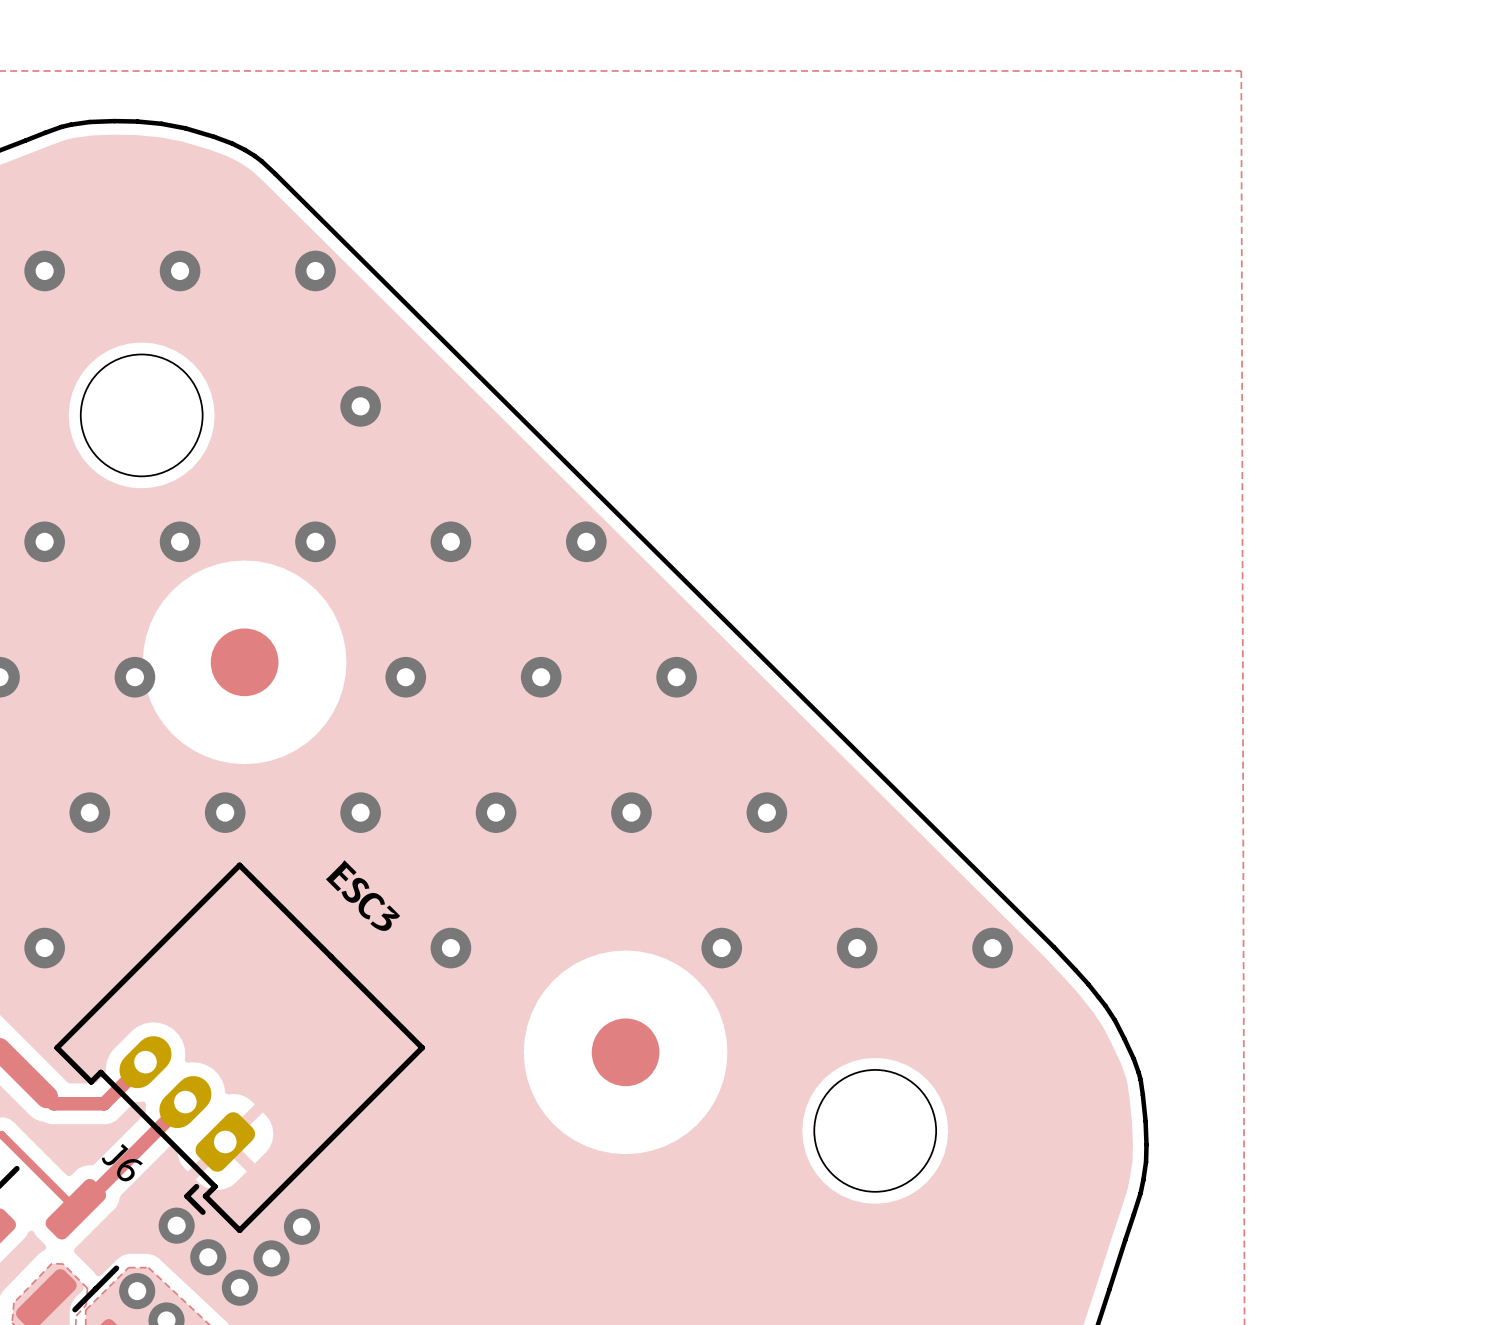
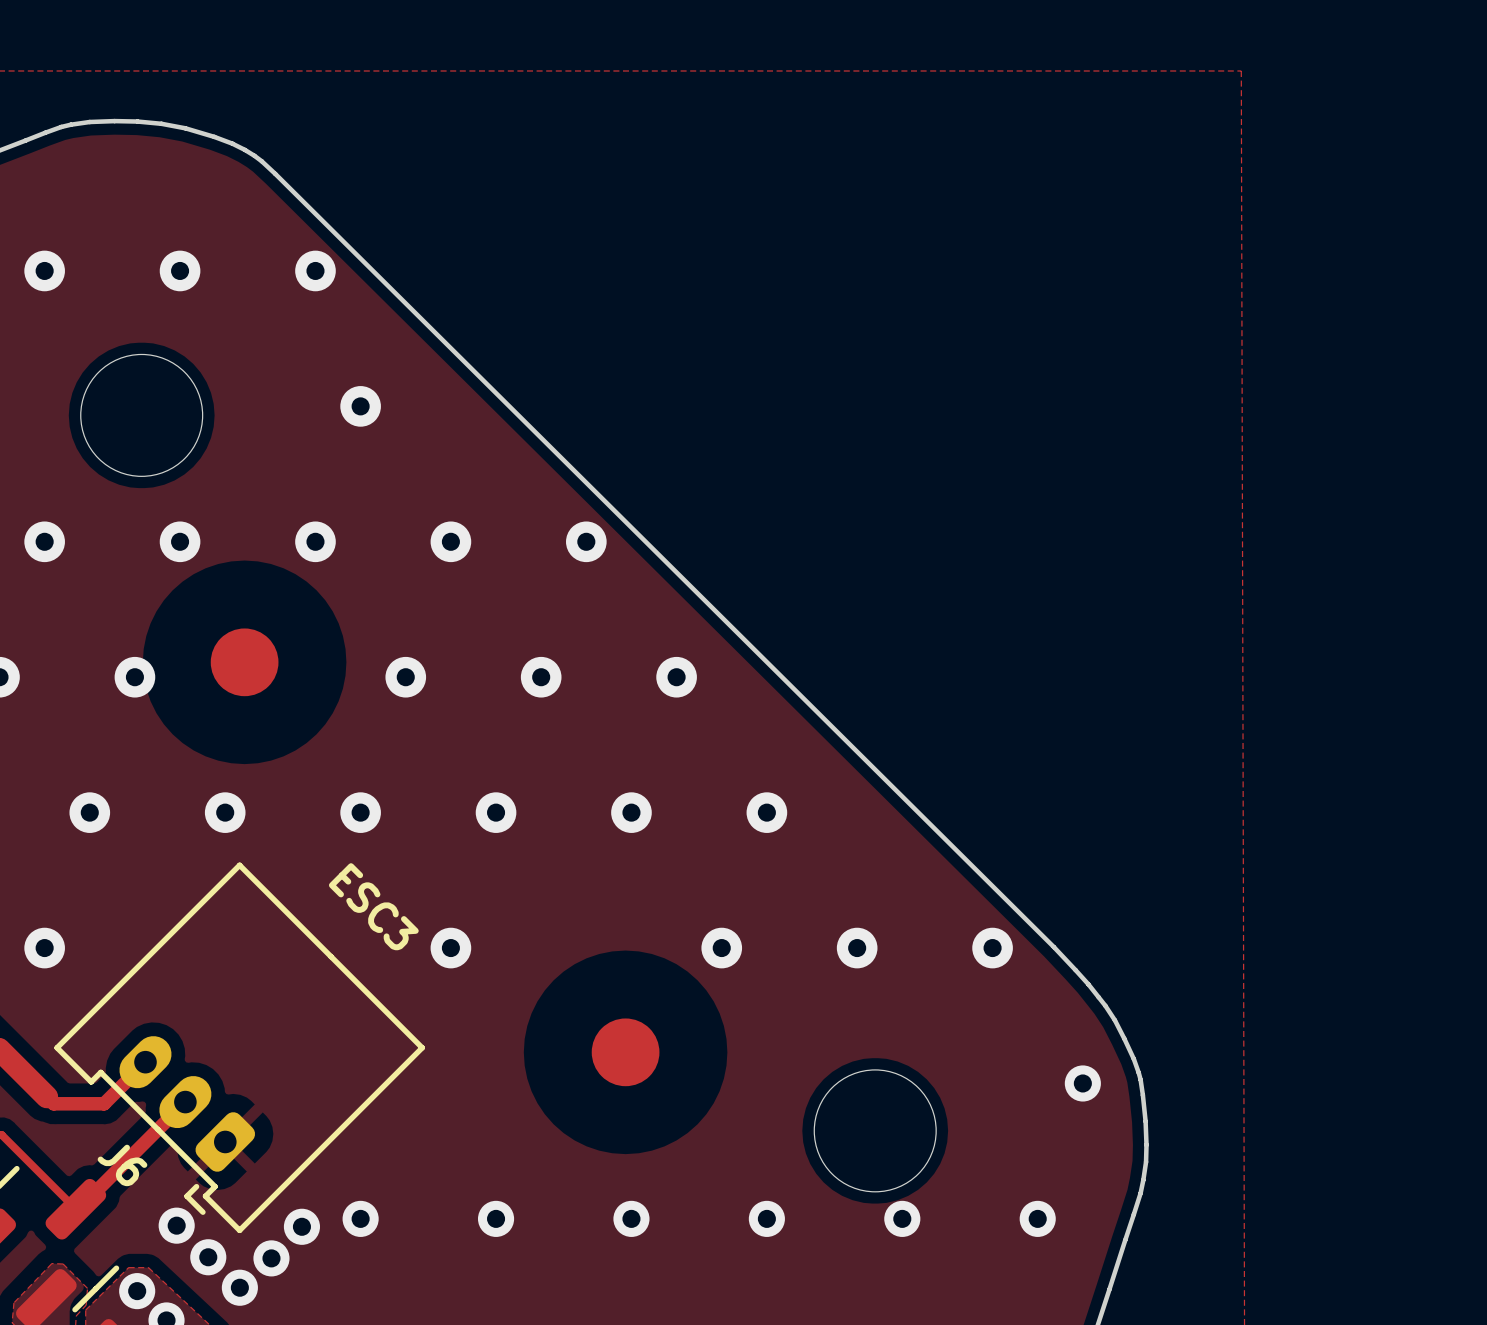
via: none -> (1082, 1083)
via: none -> (360, 1218)
via: none -> (496, 1218)
via: none -> (631, 1218)
via: none -> (766, 1218)
via: none -> (902, 1218)
via: none -> (1037, 1218)

